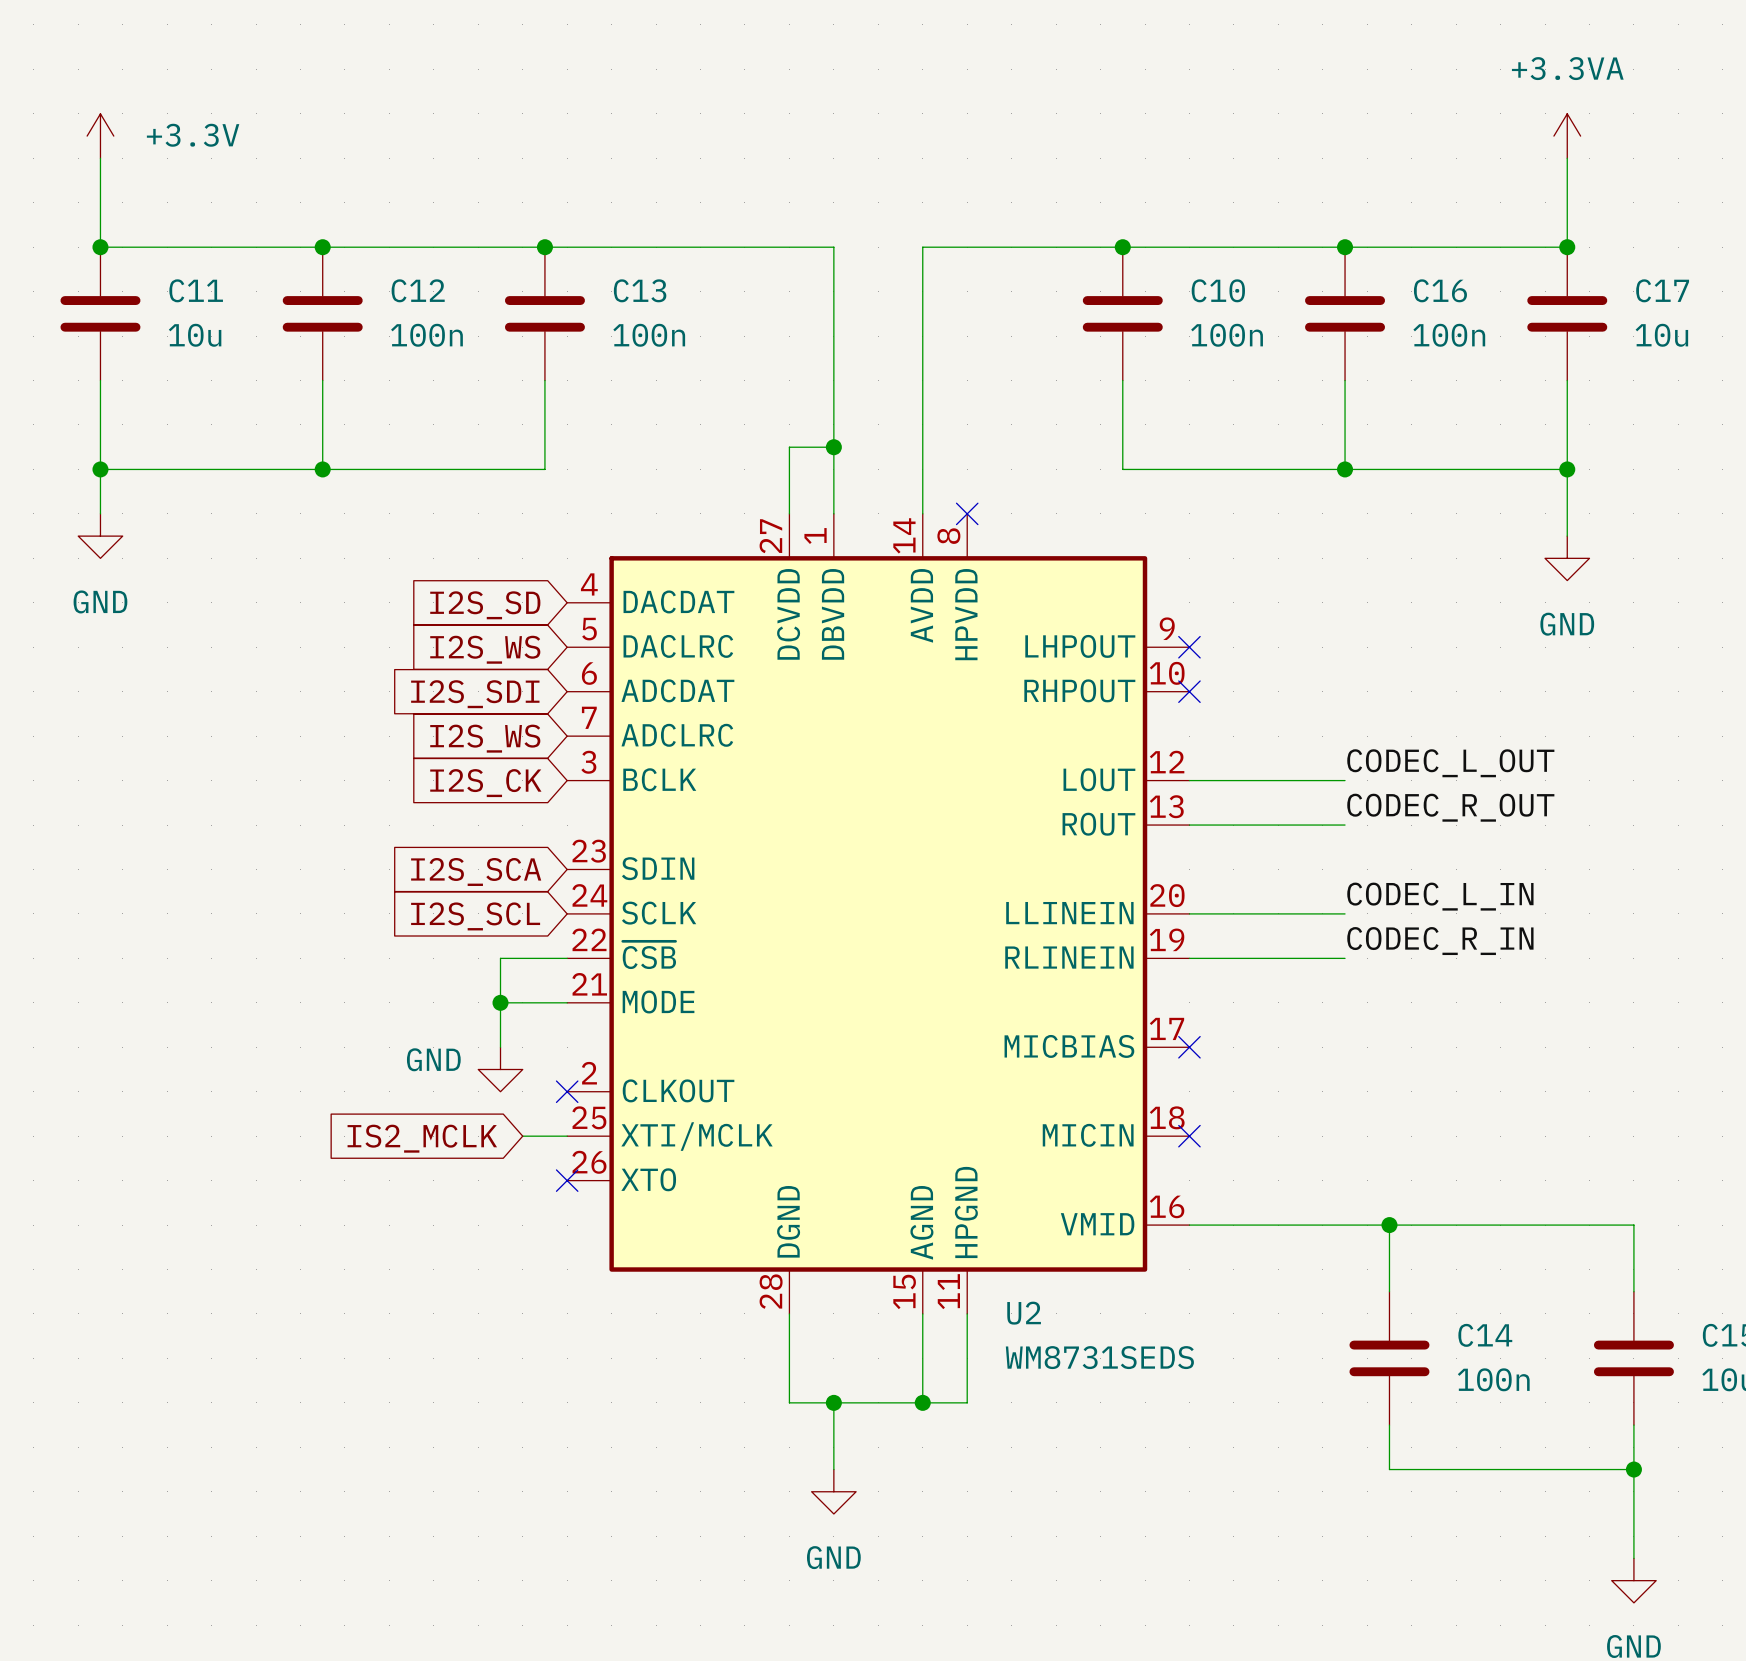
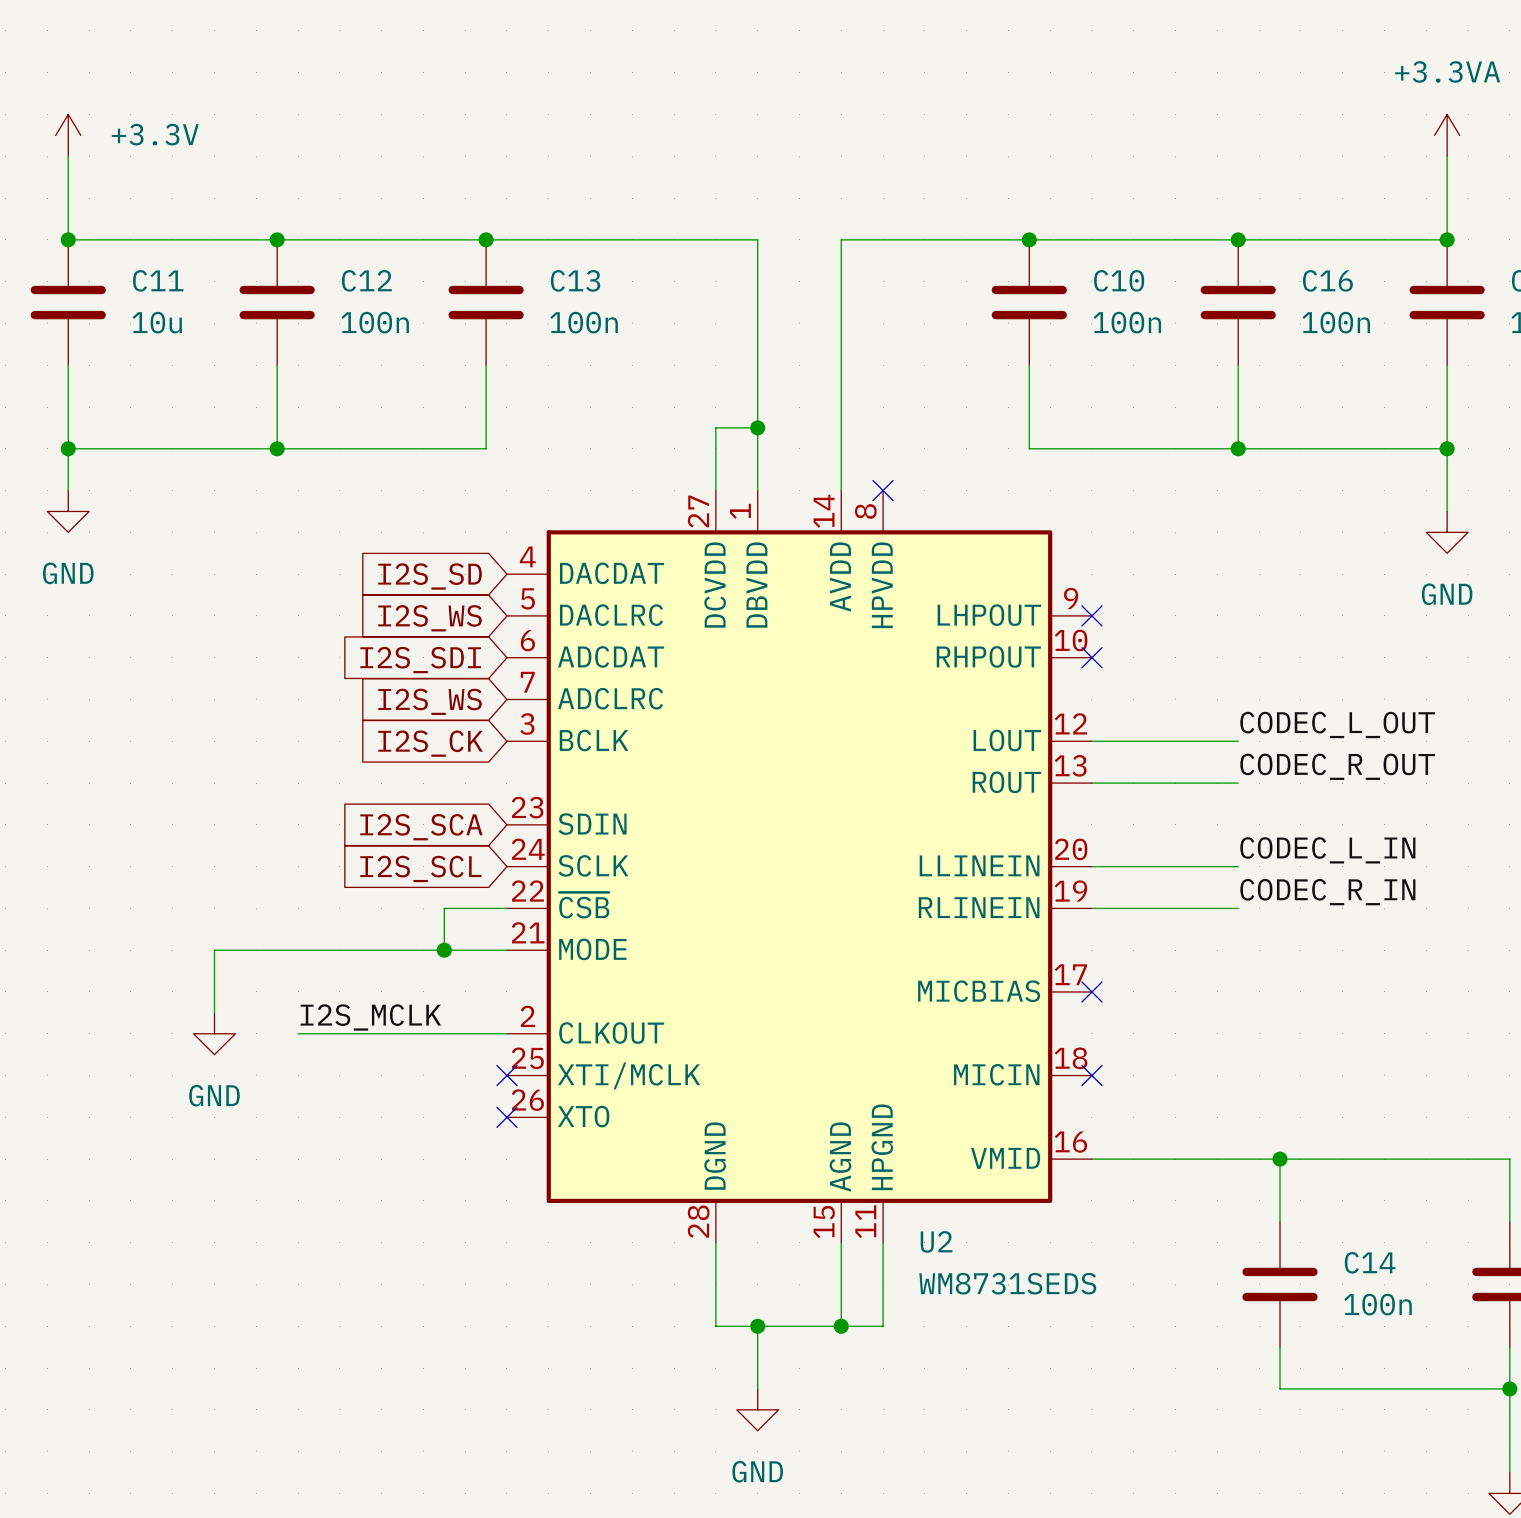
wire: (500, 1002) (500, 1047) -> (444, 950) (214, 950) (214, 1012)
power symbol text position: GND (433, 1059) -> GND (214, 1095)
power symbol position: GND (500, 1069) -> GND (214, 1033)
label: none -> I2S_MCLK (370, 1017)
wire: none -> (298, 1033) (506, 1033)
no-connect mark position: (567, 1091) -> (506, 1075)
wire: (522, 1136) (567, 1136) -> none
global label: IS2_MCLK (422, 1138) -> none

